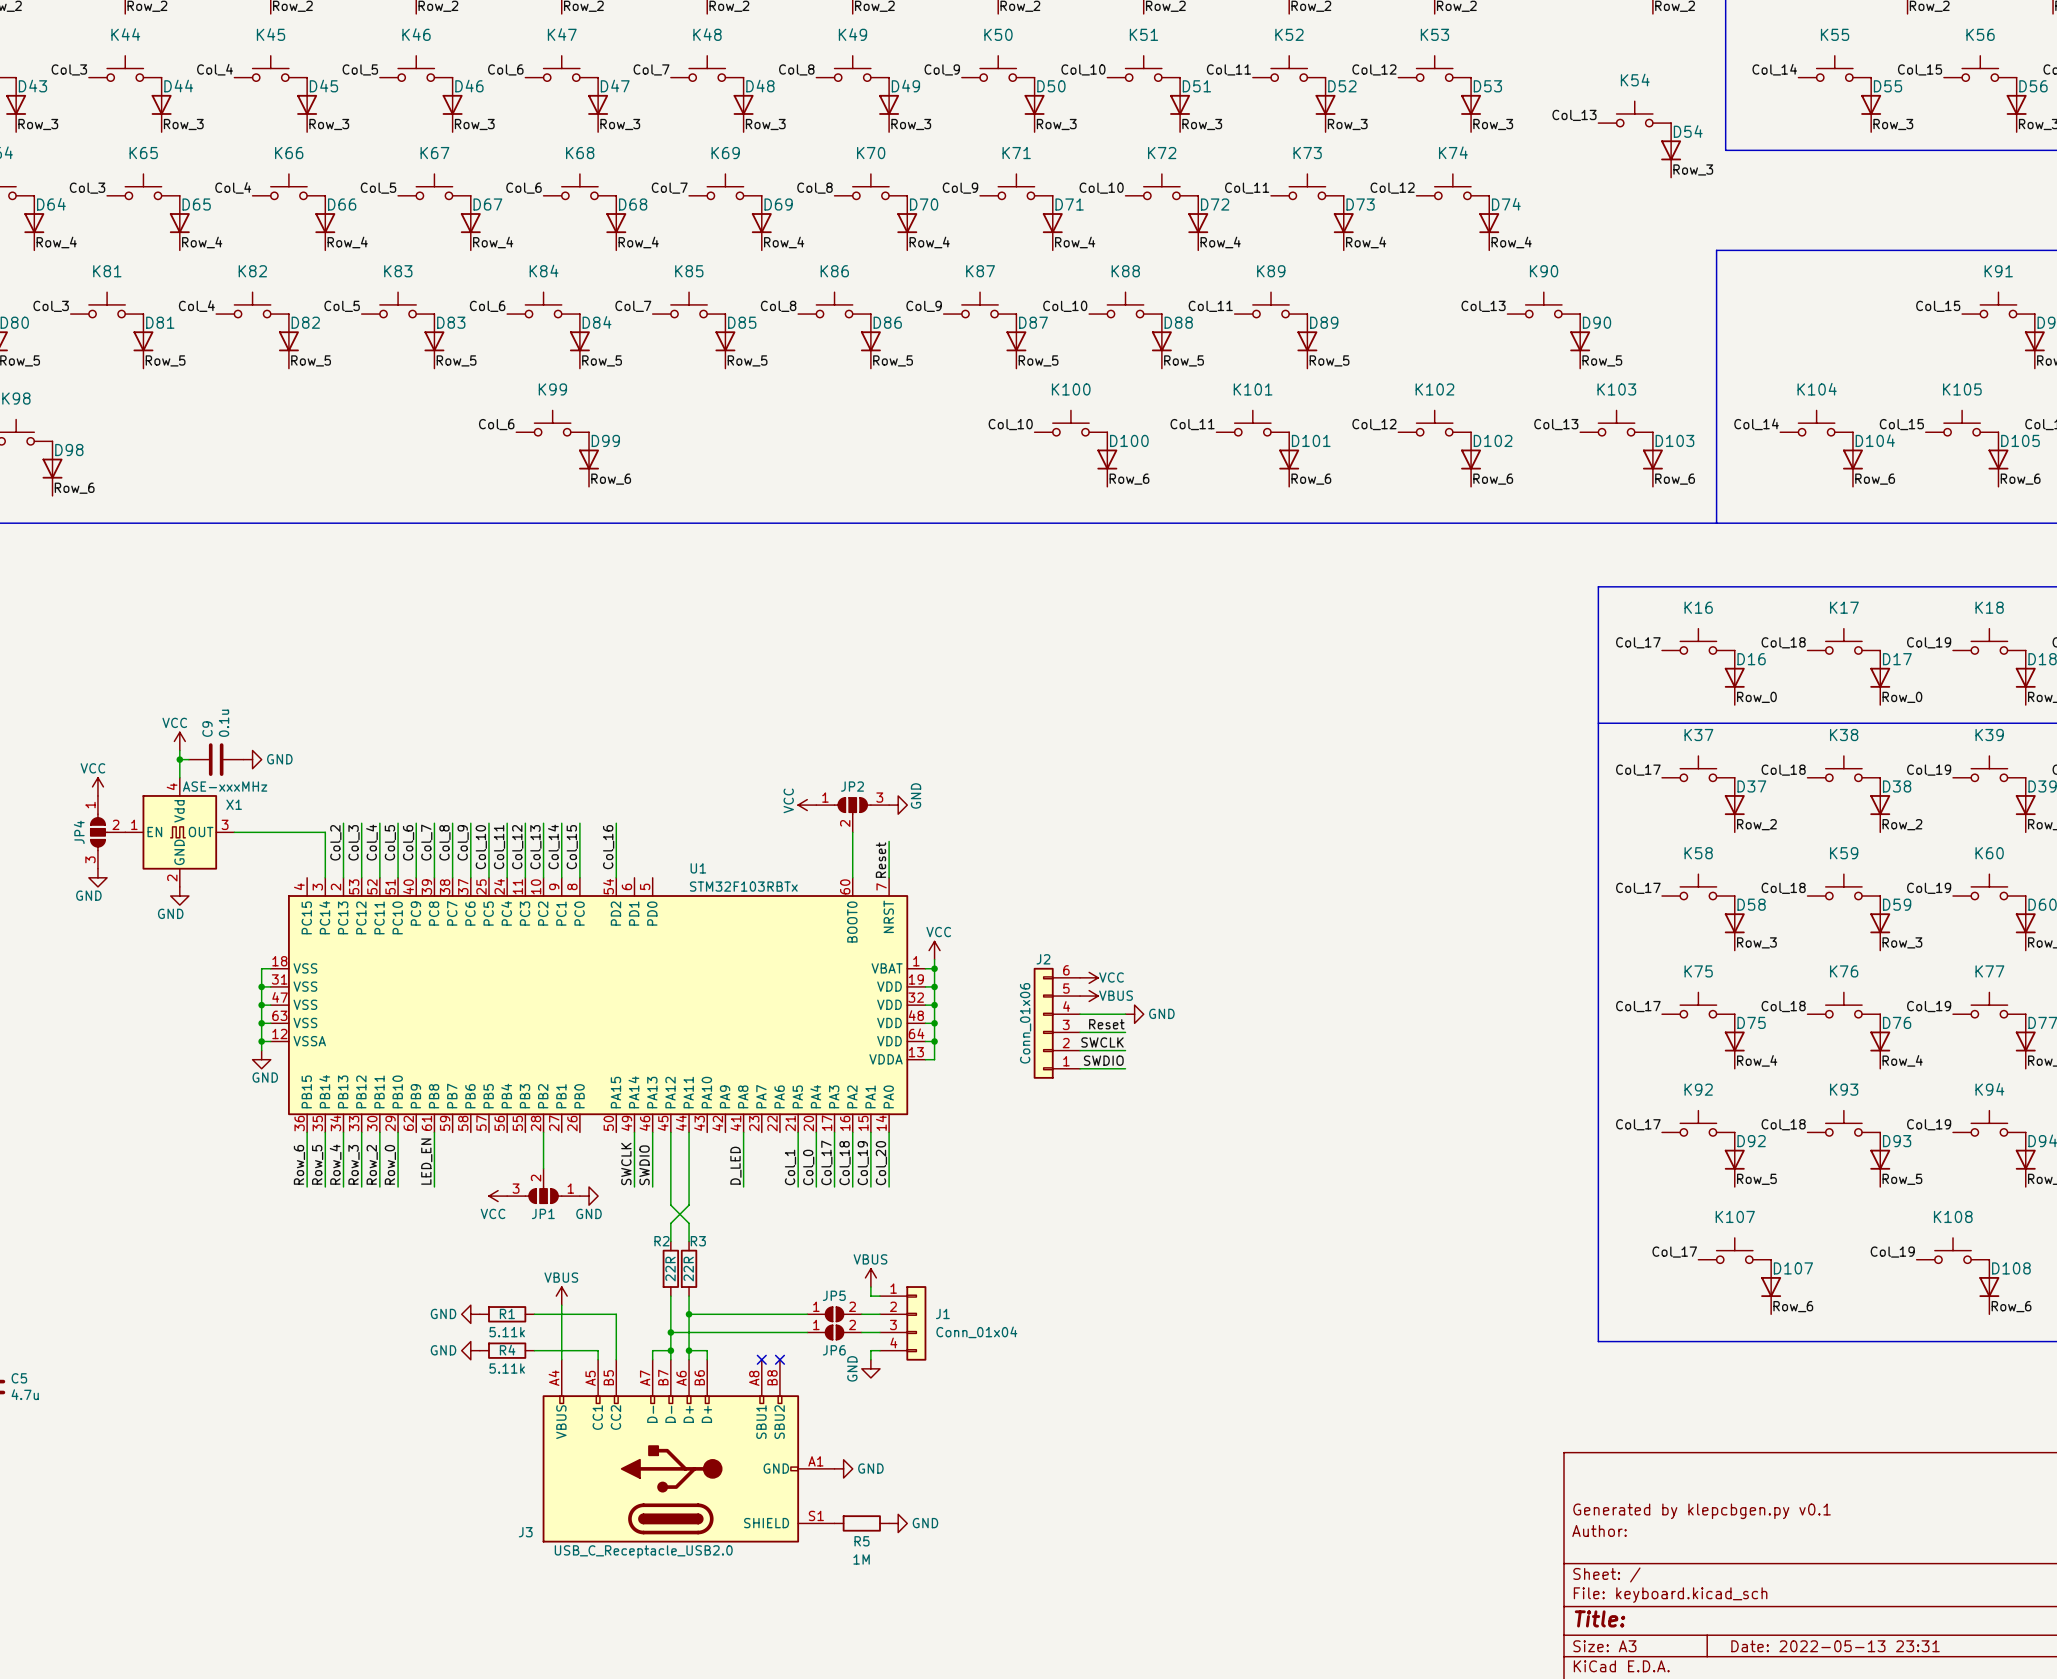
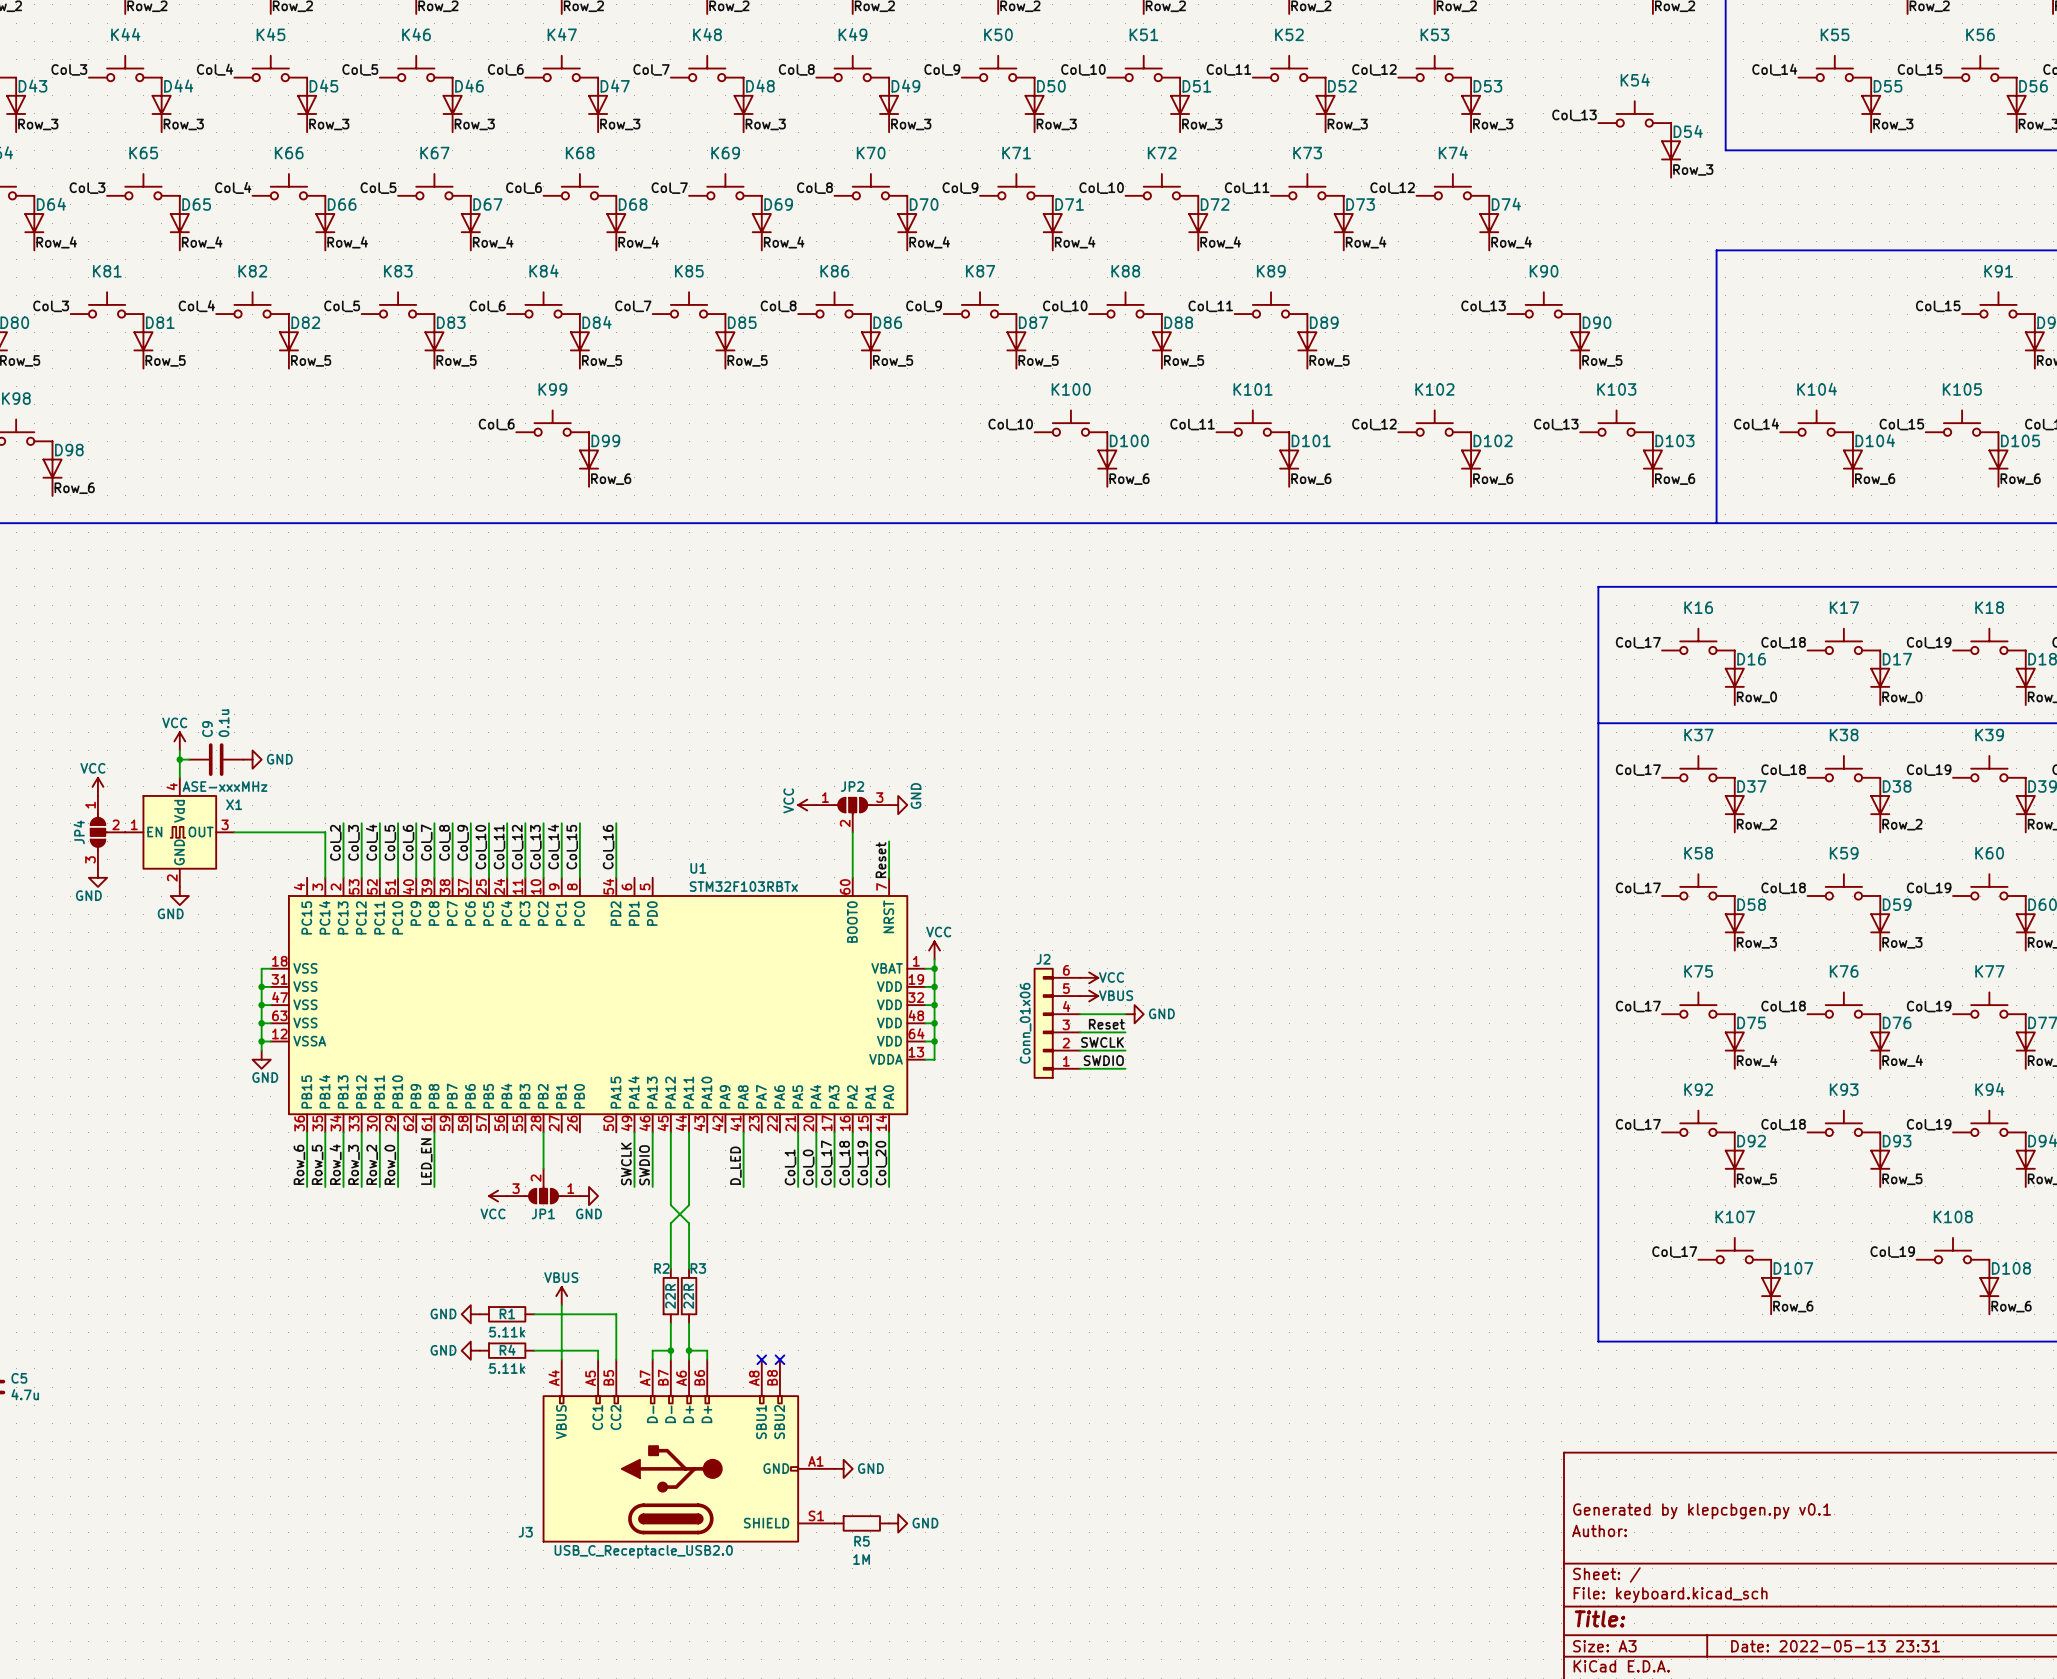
R2 position: (670, 1268) -> (670, 1296)
R3 position: (689, 1268) -> (689, 1296)
power symbol: VBUS (870, 1277) -> none
wire: (870, 1287) (870, 1296) (880, 1296) -> none
wire: (689, 1314) (807, 1314) -> none
junction: (689, 1314) -> none
JP5: (834, 1314) -> none
wire: (861, 1314) (880, 1314) -> none
J1: Conn_01x04 (903, 1323) -> none
wire: (670, 1332) (807, 1332) -> none
junction: (670, 1332) -> none
JP6: (834, 1332) -> none
wire: (861, 1332) (880, 1332) -> none
wire: (880, 1350) (870, 1350) (870, 1359) -> none
power symbol: GND (870, 1368) -> none

